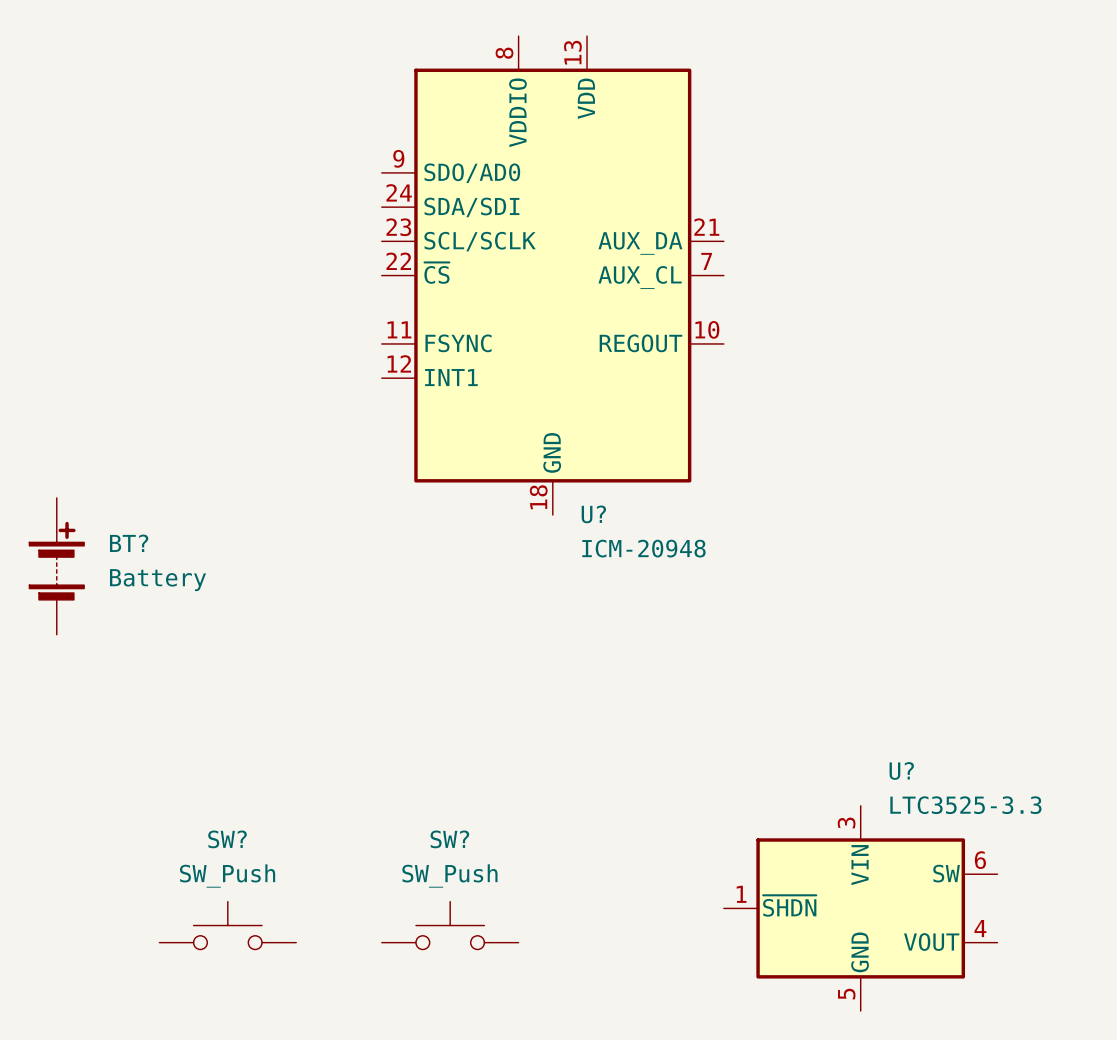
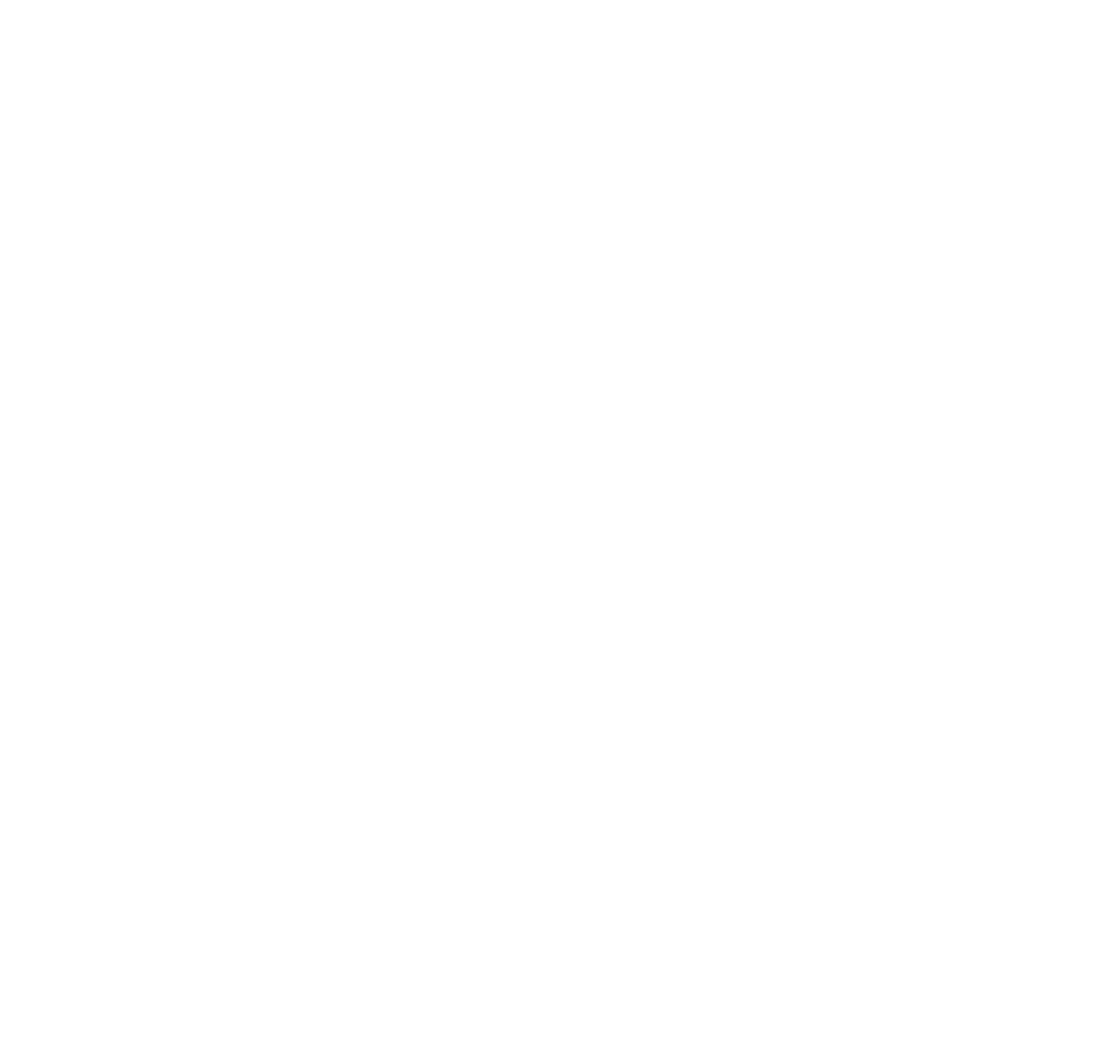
U?: ICM-20948 (552, 275) -> none
BT?: Battery (56, 566) -> none
U?: LTC3525-3.3 (860, 908) -> none
SW?: SW_Push (227, 925) -> none
SW?: SW_Push (450, 925) -> none

